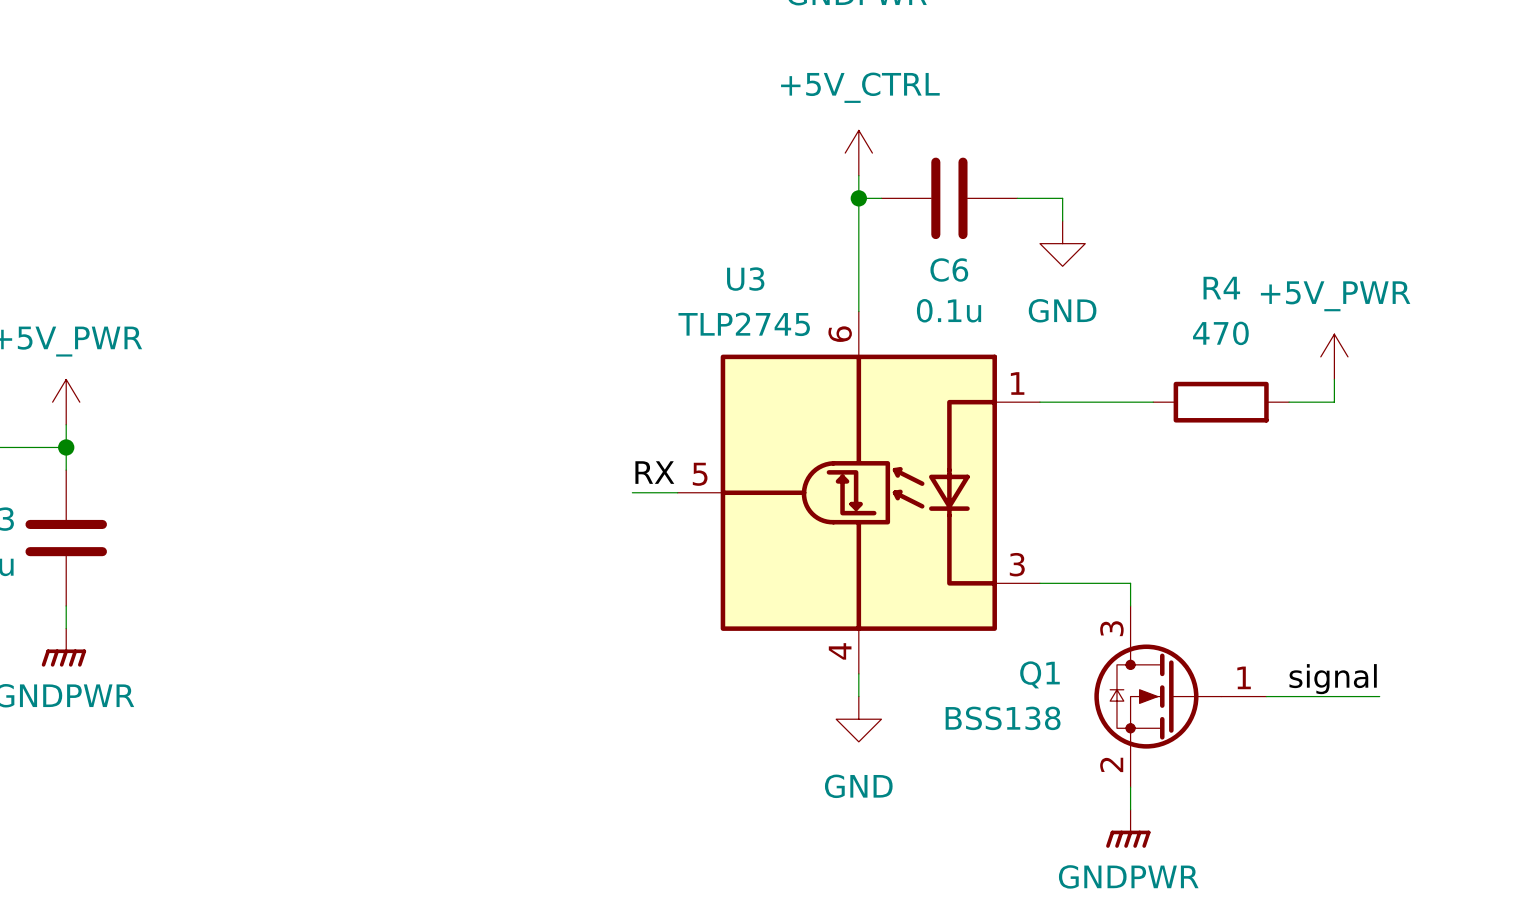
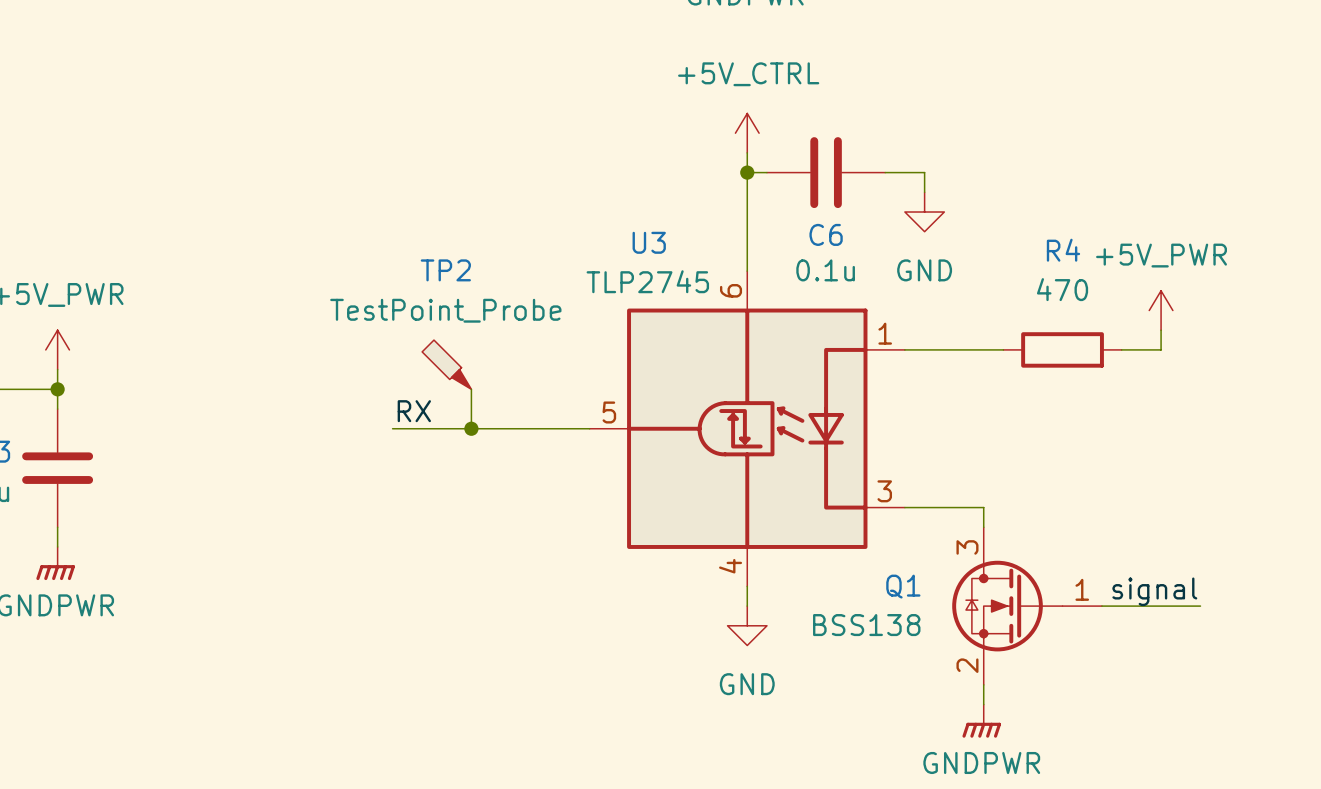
TP2: none -> TestPoint_Probe (446, 364)
wire: none -> (471, 389) (471, 428)
label position: RX (654, 472) -> RX (414, 411)
wire: none -> (392, 428) (550, 428)
junction: none -> (471, 428)

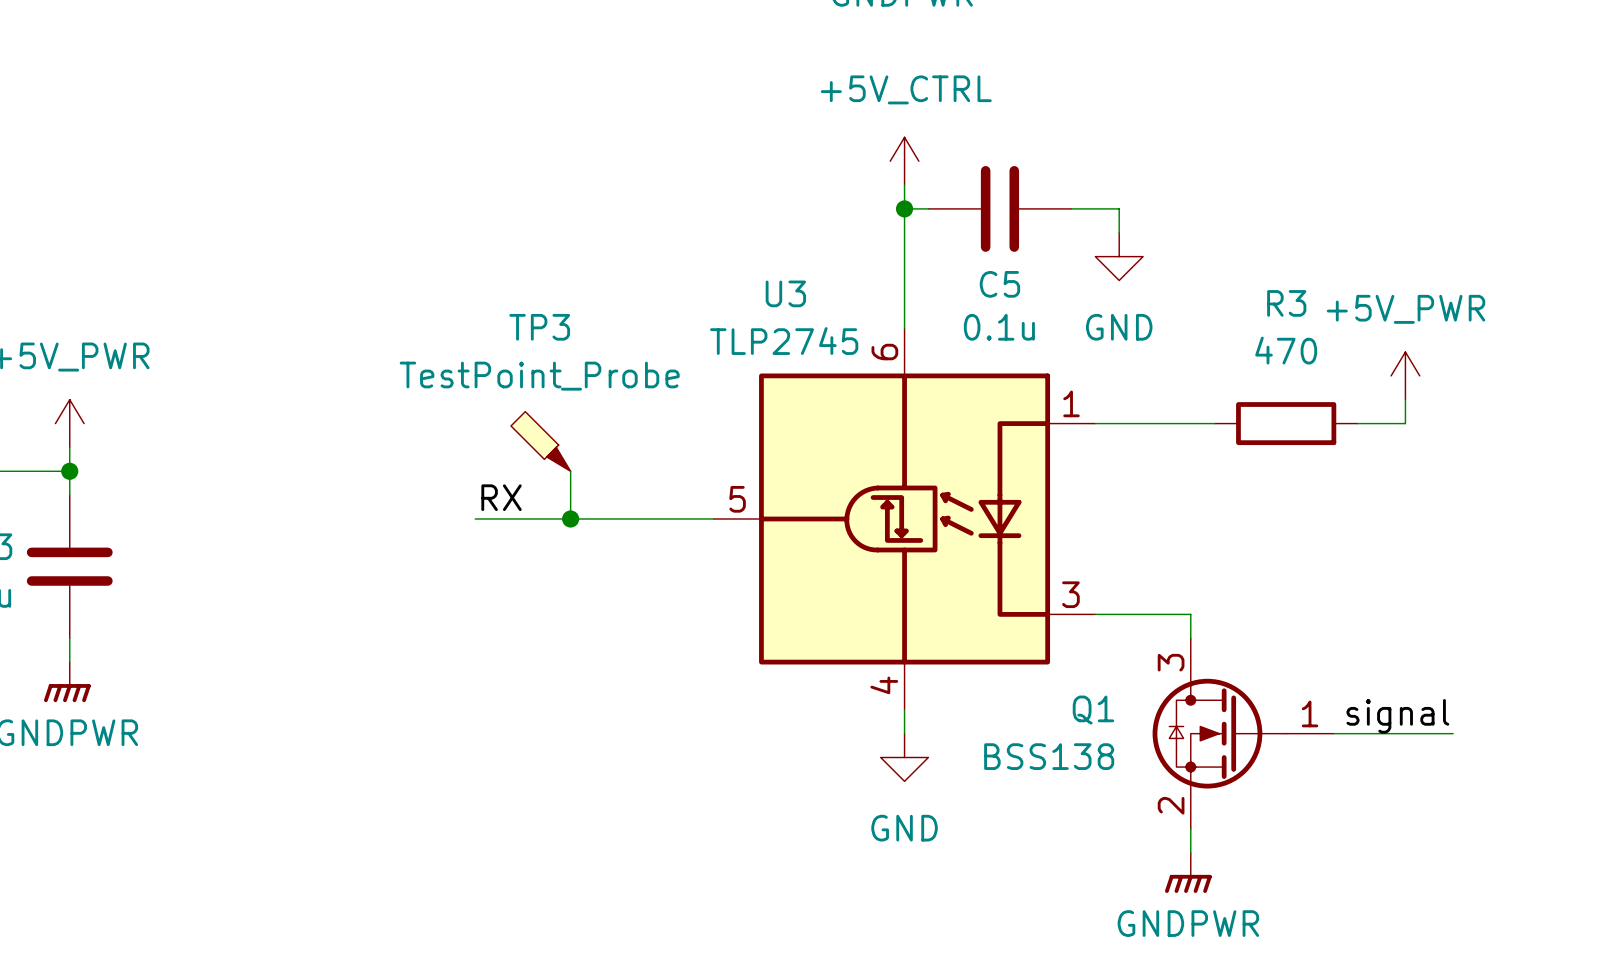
C6 name: C6 (826, 234) -> C5 (999, 284)
R4 name: R4 (1063, 250) -> R3 (1286, 303)
TP2 name: TP2 (445, 270) -> TP3 (539, 327)

